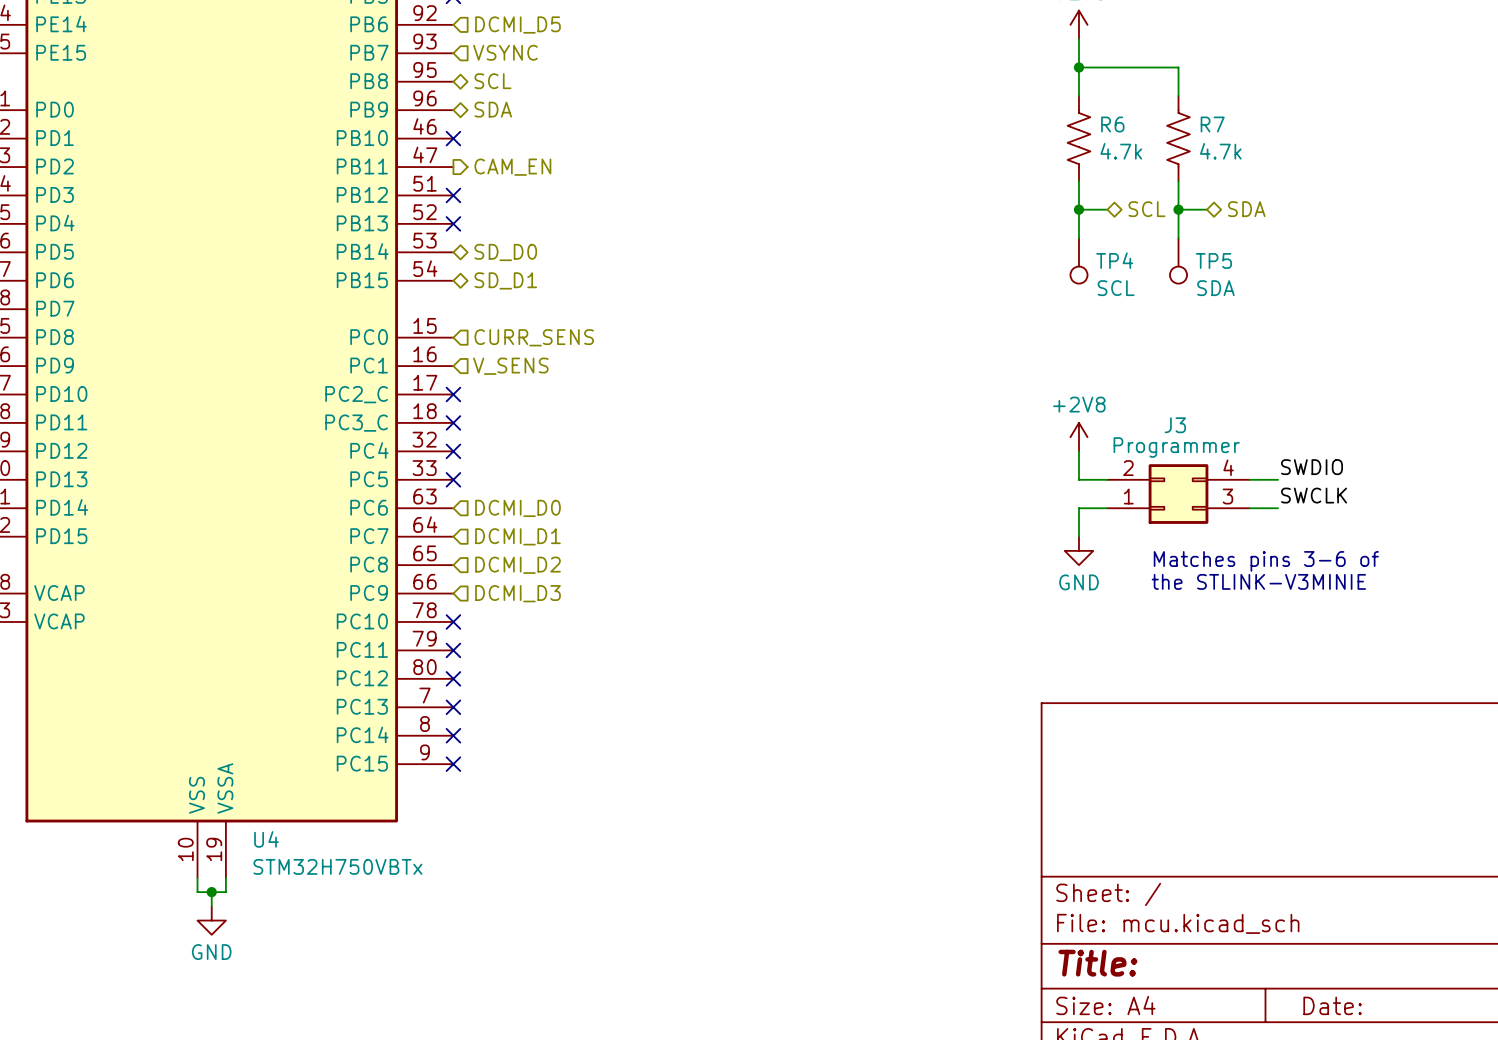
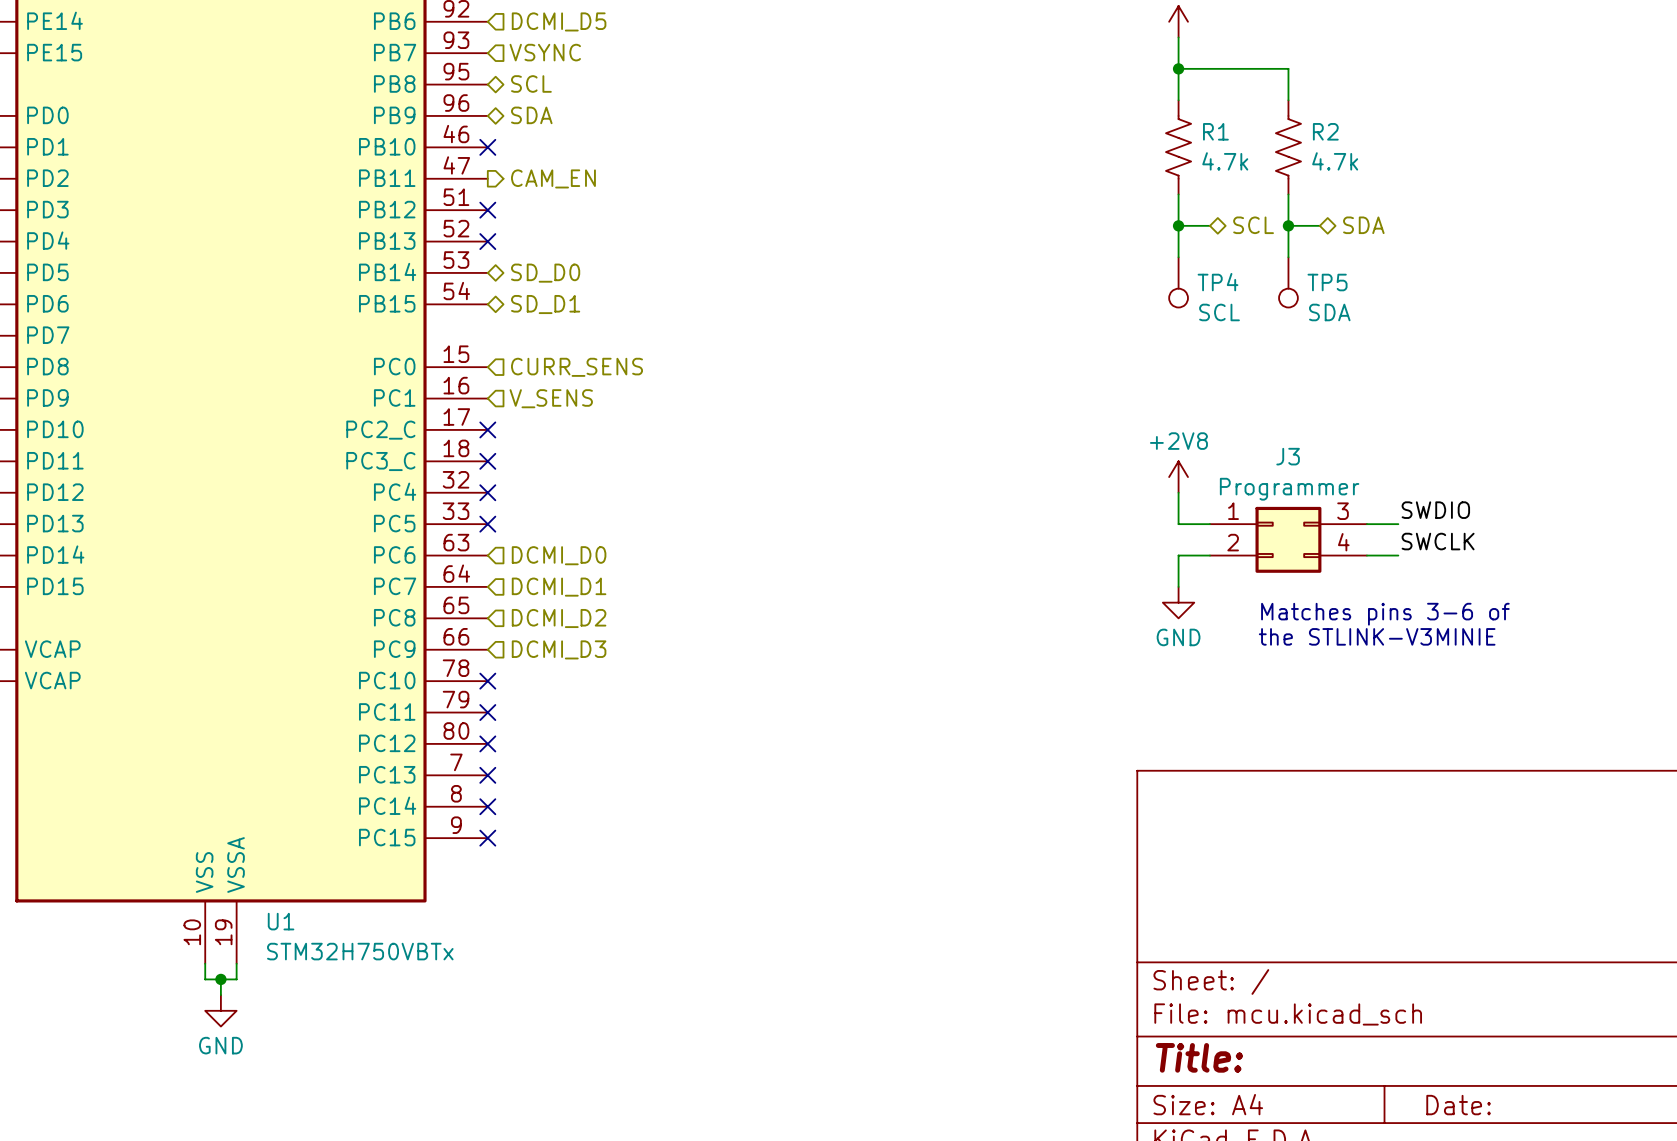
R6 name: R6 (1112, 124) -> R1 (1215, 131)
R7 name: R7 (1212, 124) -> R2 (1325, 131)
J3 flip: as is (1178, 494) -> up-down (1288, 539)
U4 name: U4 (266, 839) -> U1 (281, 921)

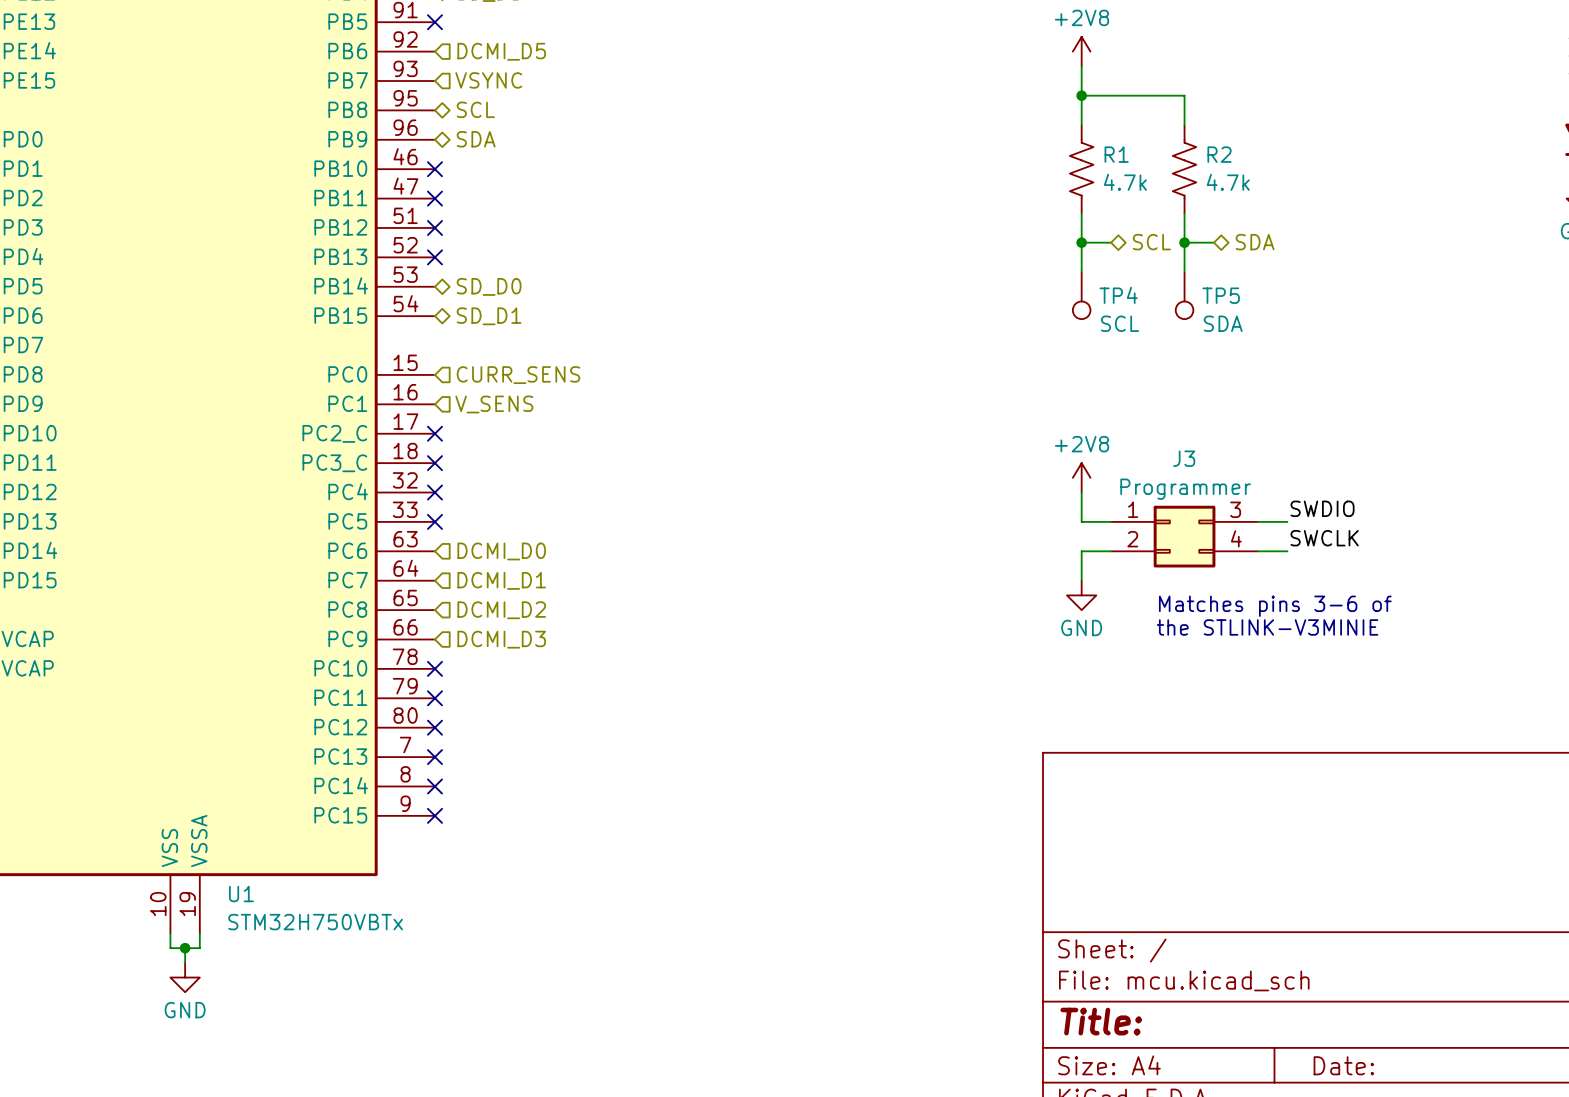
no-connect mark: none -> (434, 198)
hierarchical label: CAM_EN (553, 178) -> none

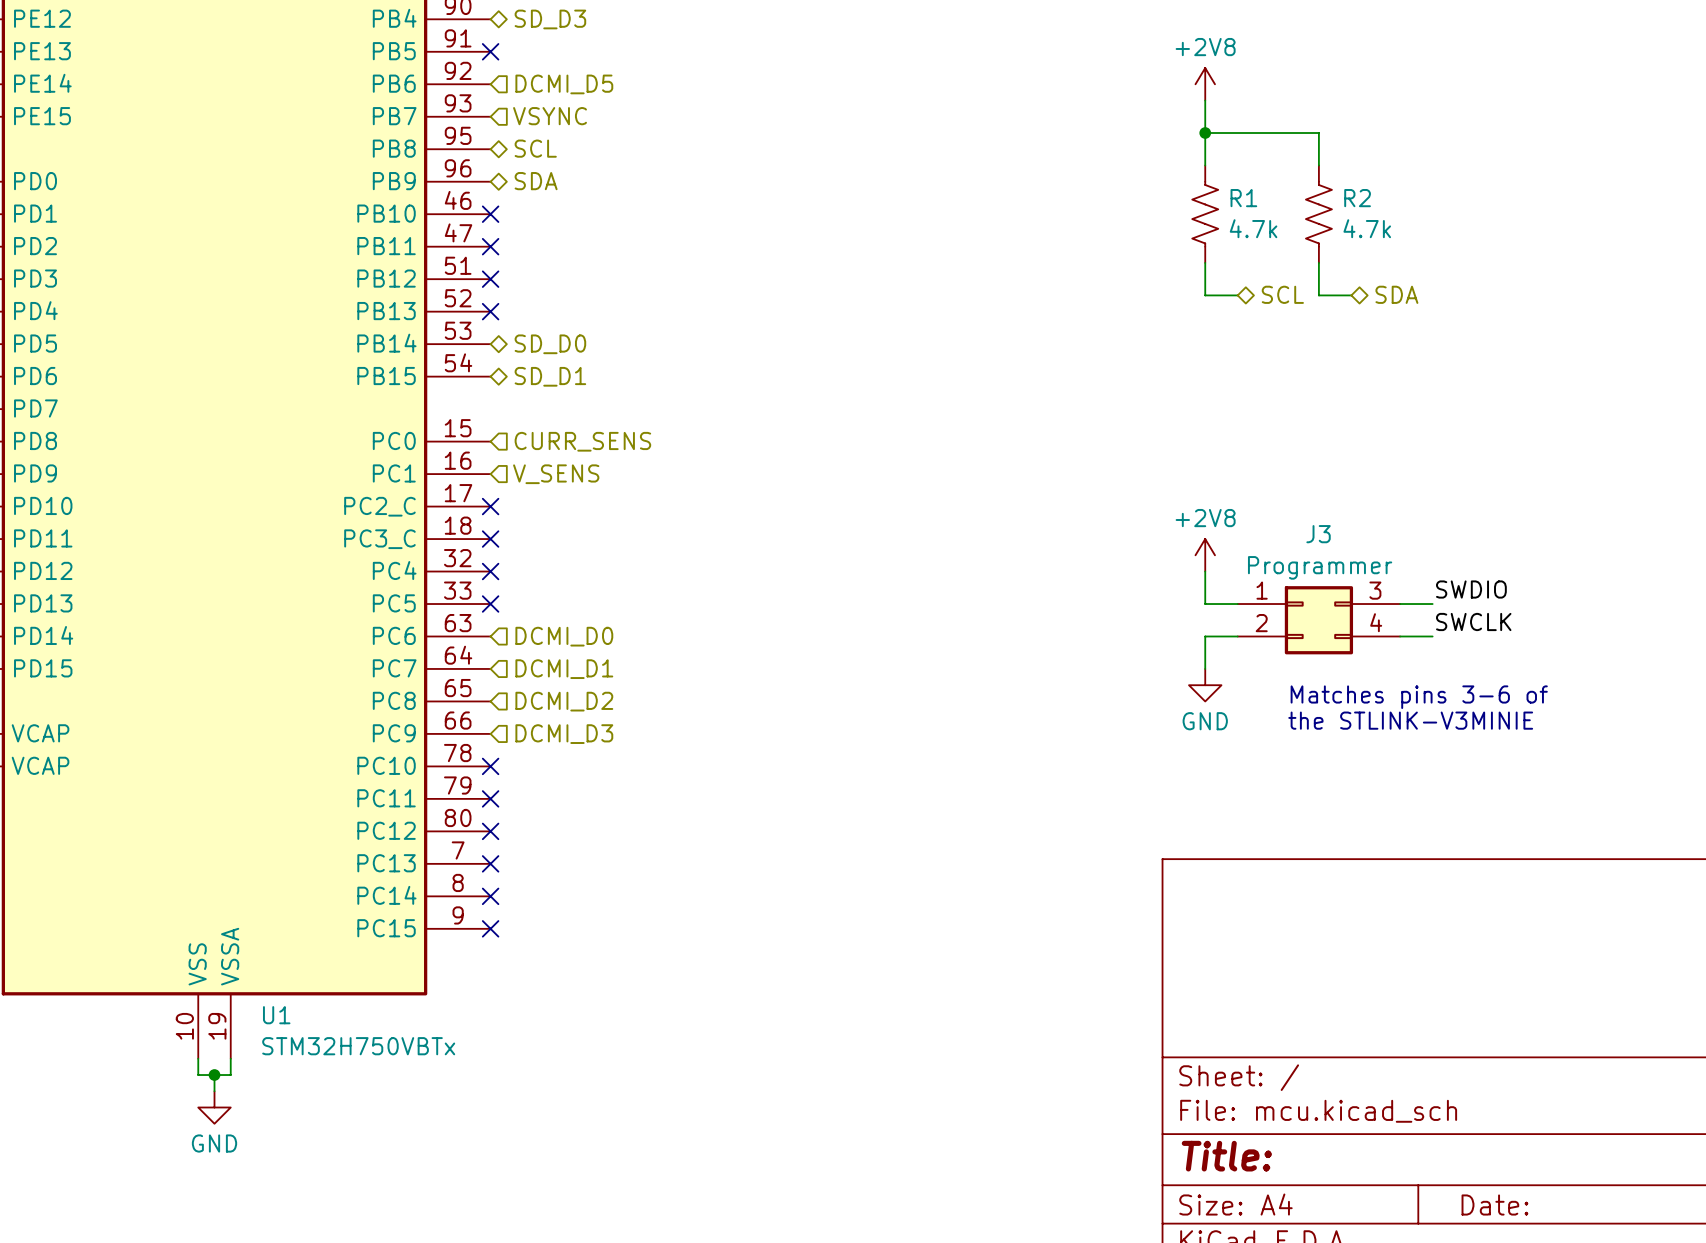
wire: (1081, 242) (1081, 272) -> none
junction: (1081, 242) -> none
wire: (1184, 242) (1184, 272) -> none
junction: (1184, 242) -> none
TP4: SCL (1081, 295) -> none
TP5: SDA (1184, 295) -> none

